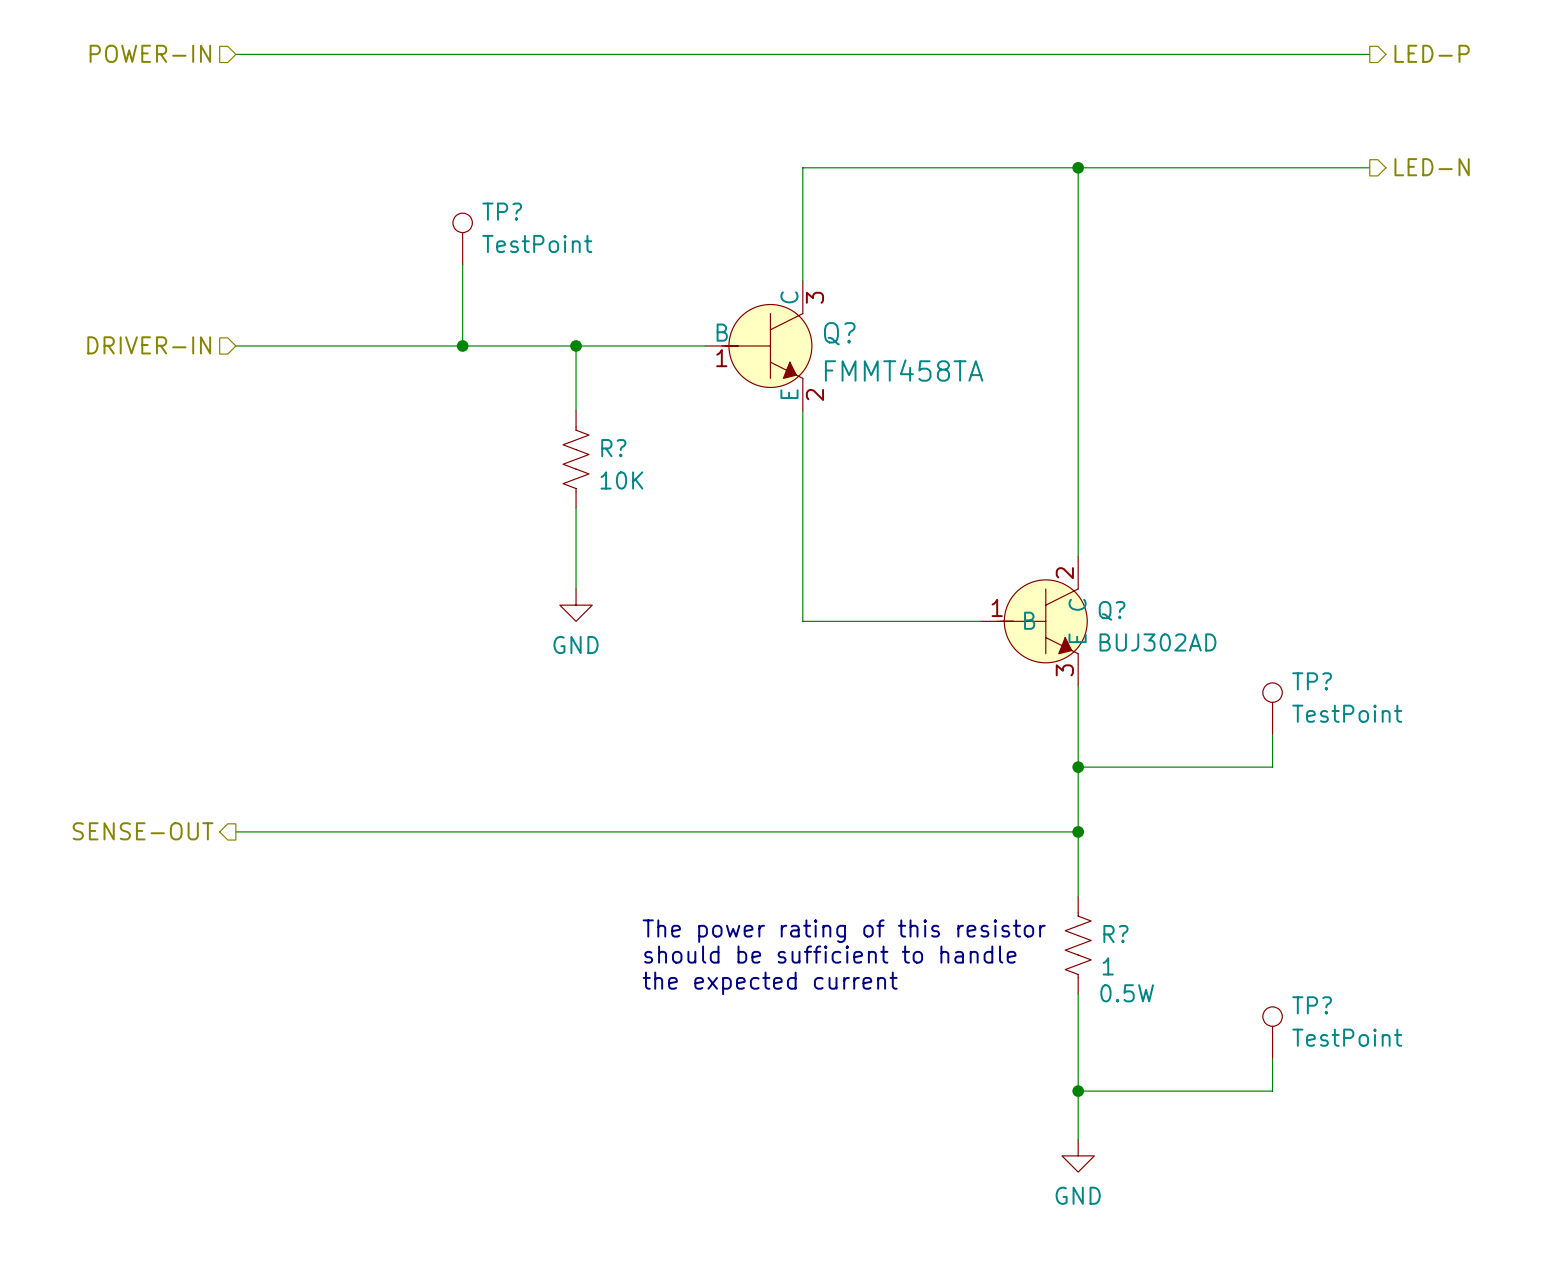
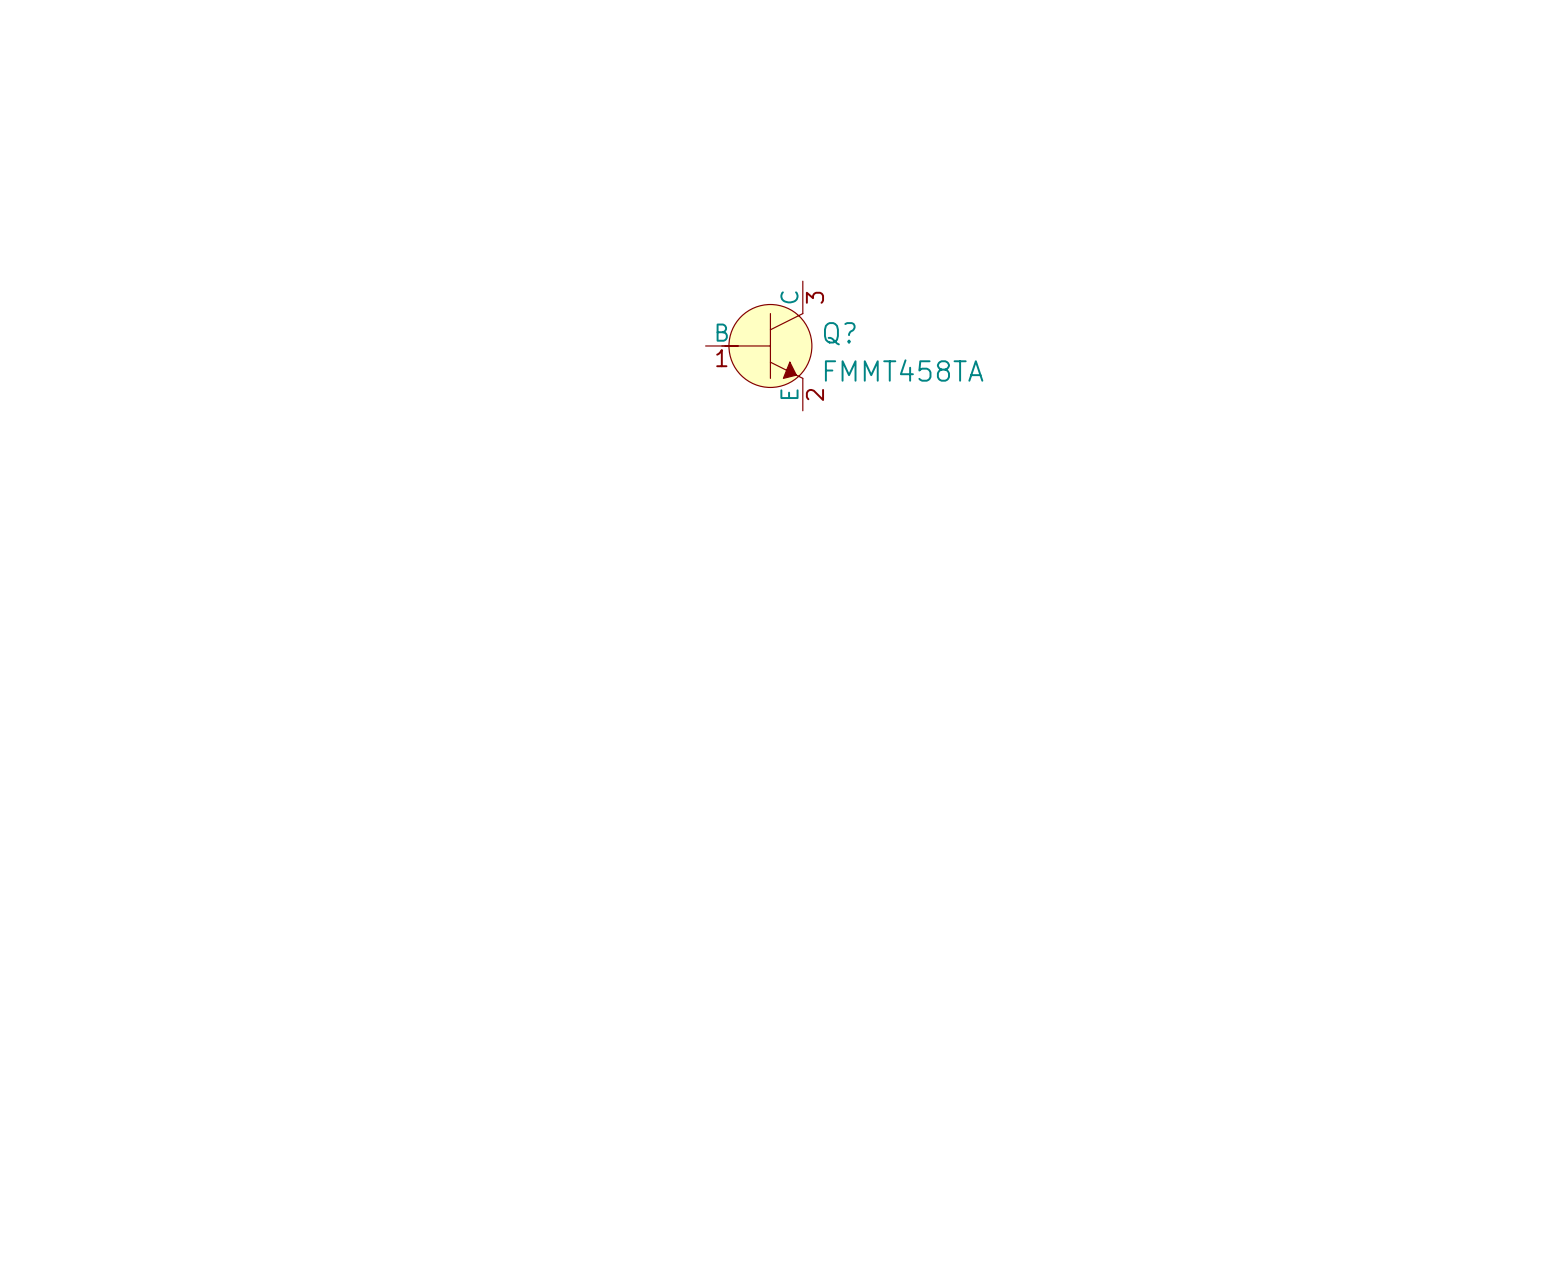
hierarchical label: POWER-IN (150, 53) -> none
hierarchical label: LED-P (1432, 53) -> none
wire: (235, 54) (1369, 54) -> none
wire: (1078, 167) (1078, 556) -> none
junction: (1078, 167) -> none
wire: (1369, 167) (802, 167) (802, 281) -> none
hierarchical label: LED-N (1432, 167) -> none
TP?: TestPoint (462, 239) -> none
wire: (462, 264) (462, 345) -> none
hierarchical label: DRIVER-IN (149, 345) -> none
wire: (235, 345) (705, 345) -> none
junction: (462, 345) -> none
wire: (576, 345) (576, 410) -> none
junction: (576, 345) -> none
wire: (802, 410) (802, 621) (980, 621) -> none
R?: 10K (576, 459) -> none
wire: (576, 507) (576, 588) -> none
power symbol: GND (576, 605) -> none
Q?: BUJ302AD (1034, 621) -> none
wire: (1078, 686) (1078, 896) -> none
TP?: TestPoint (1272, 708) -> none
wire: (1272, 734) (1272, 767) (1078, 767) -> none
junction: (1078, 767) -> none
hierarchical label: SENSE-OUT (143, 831) -> none
wire: (235, 831) (1078, 831) -> none
junction: (1078, 831) -> none
text: The power rating of this resistor (844, 931) -> none
R?: 1 (1078, 945) -> none
text: should be sufficient to handle (830, 954) -> none
text: the expected current (770, 983) -> none
wire: (1078, 993) (1078, 1139) -> none
TP?: TestPoint (1272, 1032) -> none
wire: (1272, 1058) (1272, 1091) (1078, 1091) -> none
junction: (1078, 1091) -> none
power symbol: GND (1078, 1155) -> none

